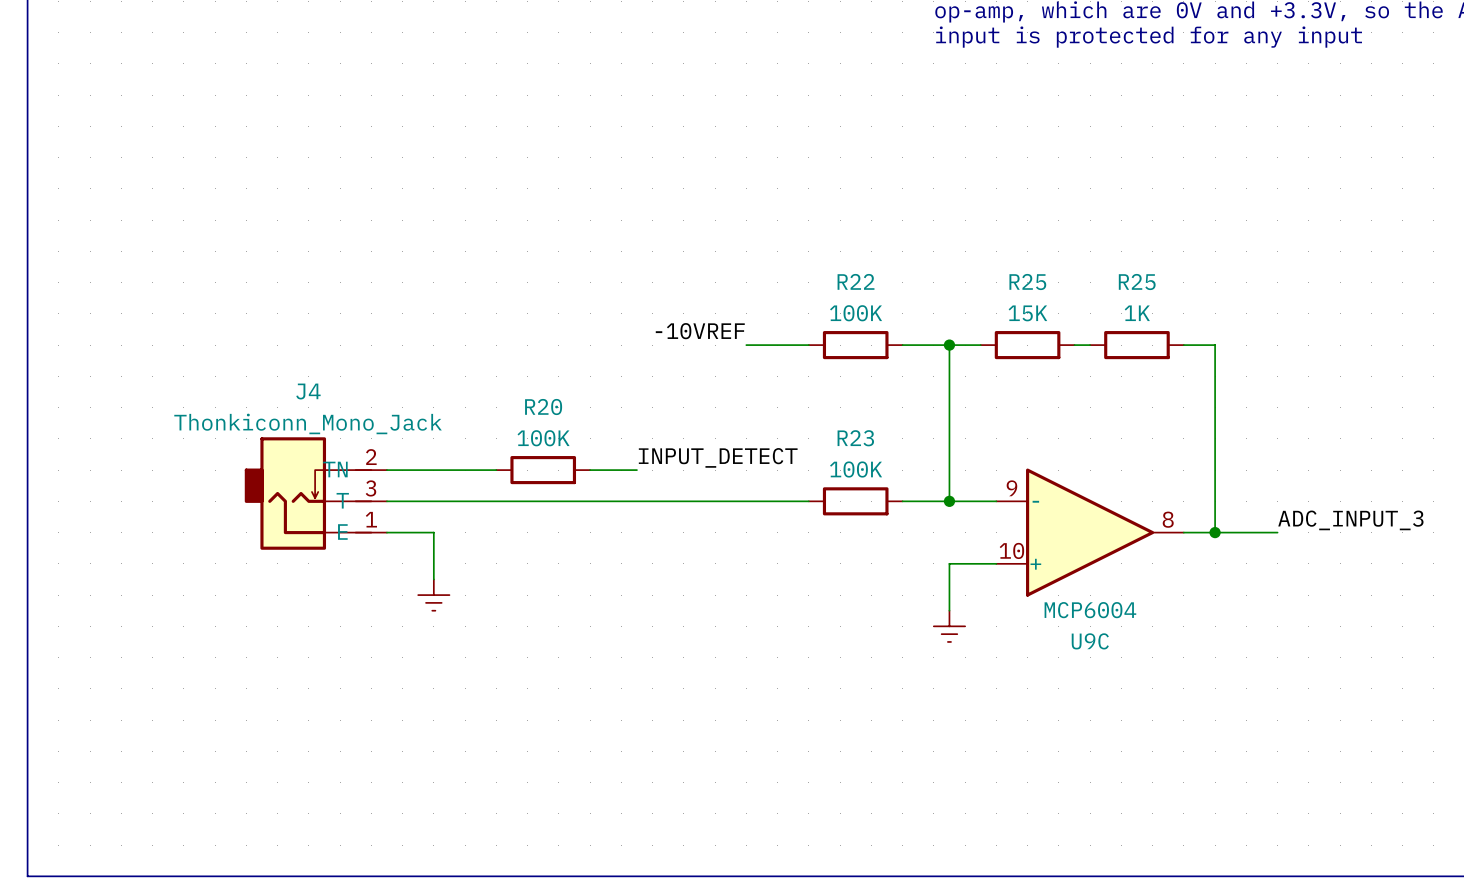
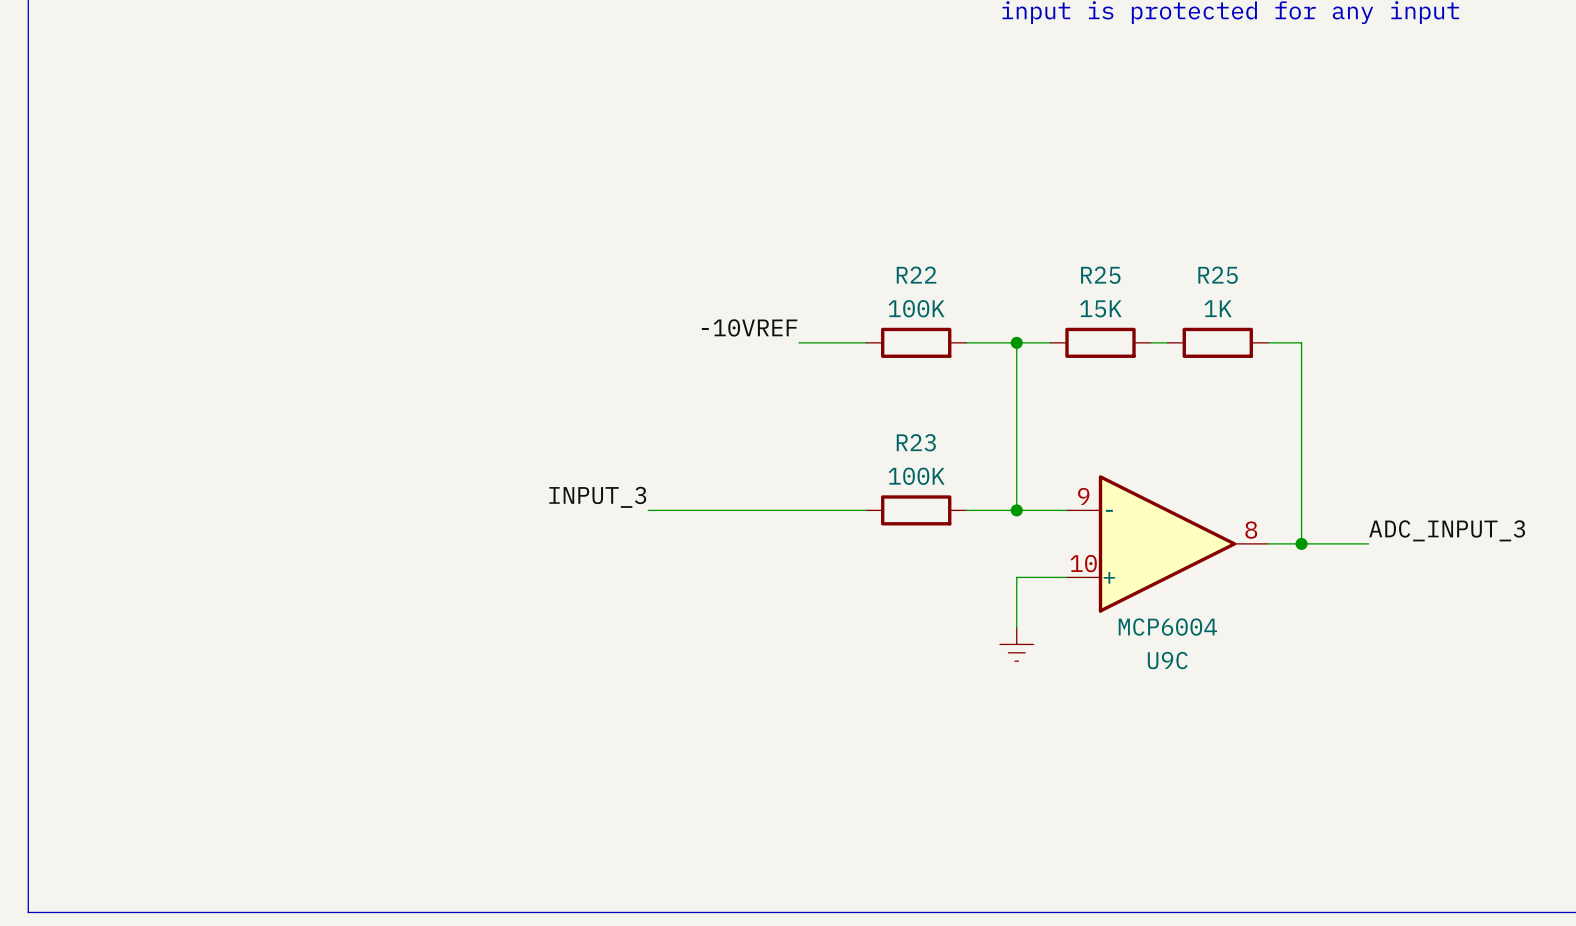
label: INPUT_DETECT (718, 457) -> none
wire: (386, 470) (496, 470) -> none
R20: 100K (543, 470) -> none
wire: (590, 470) (636, 470) -> none
label: none -> INPUT_3 (597, 497)
J4: Thonkiconn_Mono_Jack (315, 493) -> none
wire: (386, 501) (605, 501) -> none
wire: (386, 532) (433, 532) (433, 579) -> none
power symbol: (433, 595) -> none

